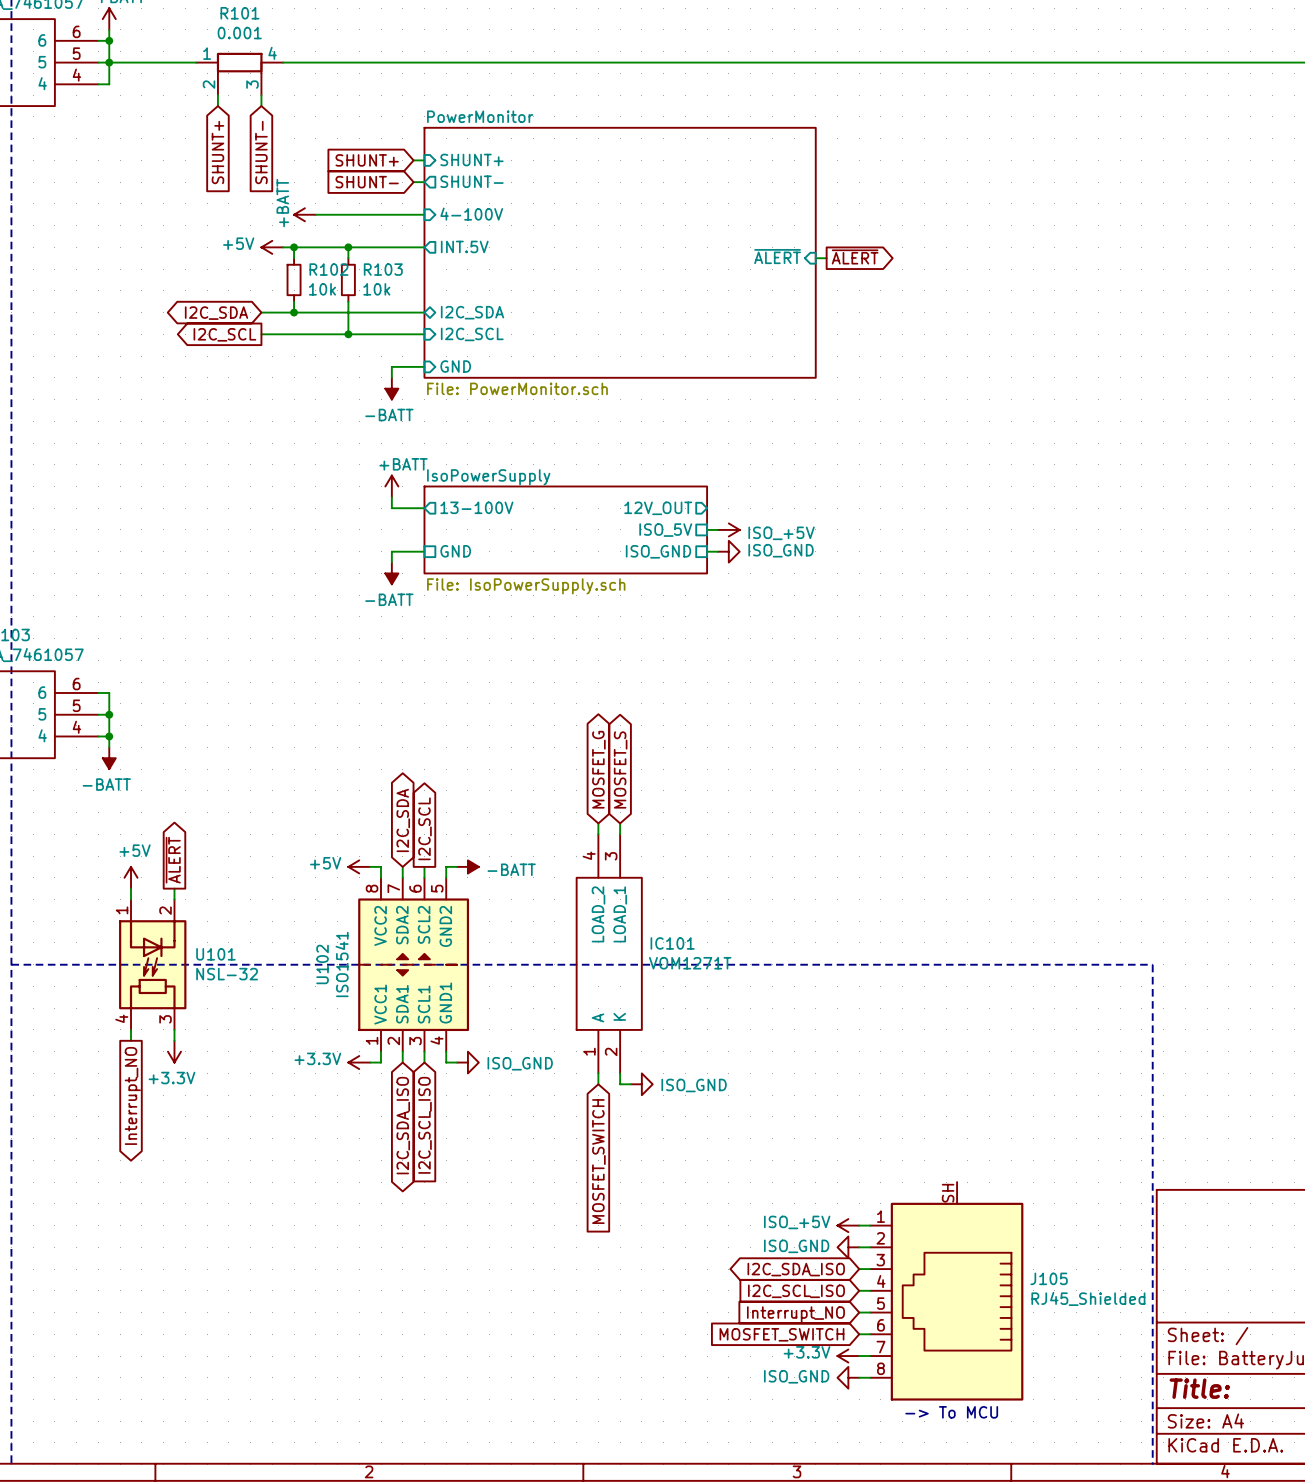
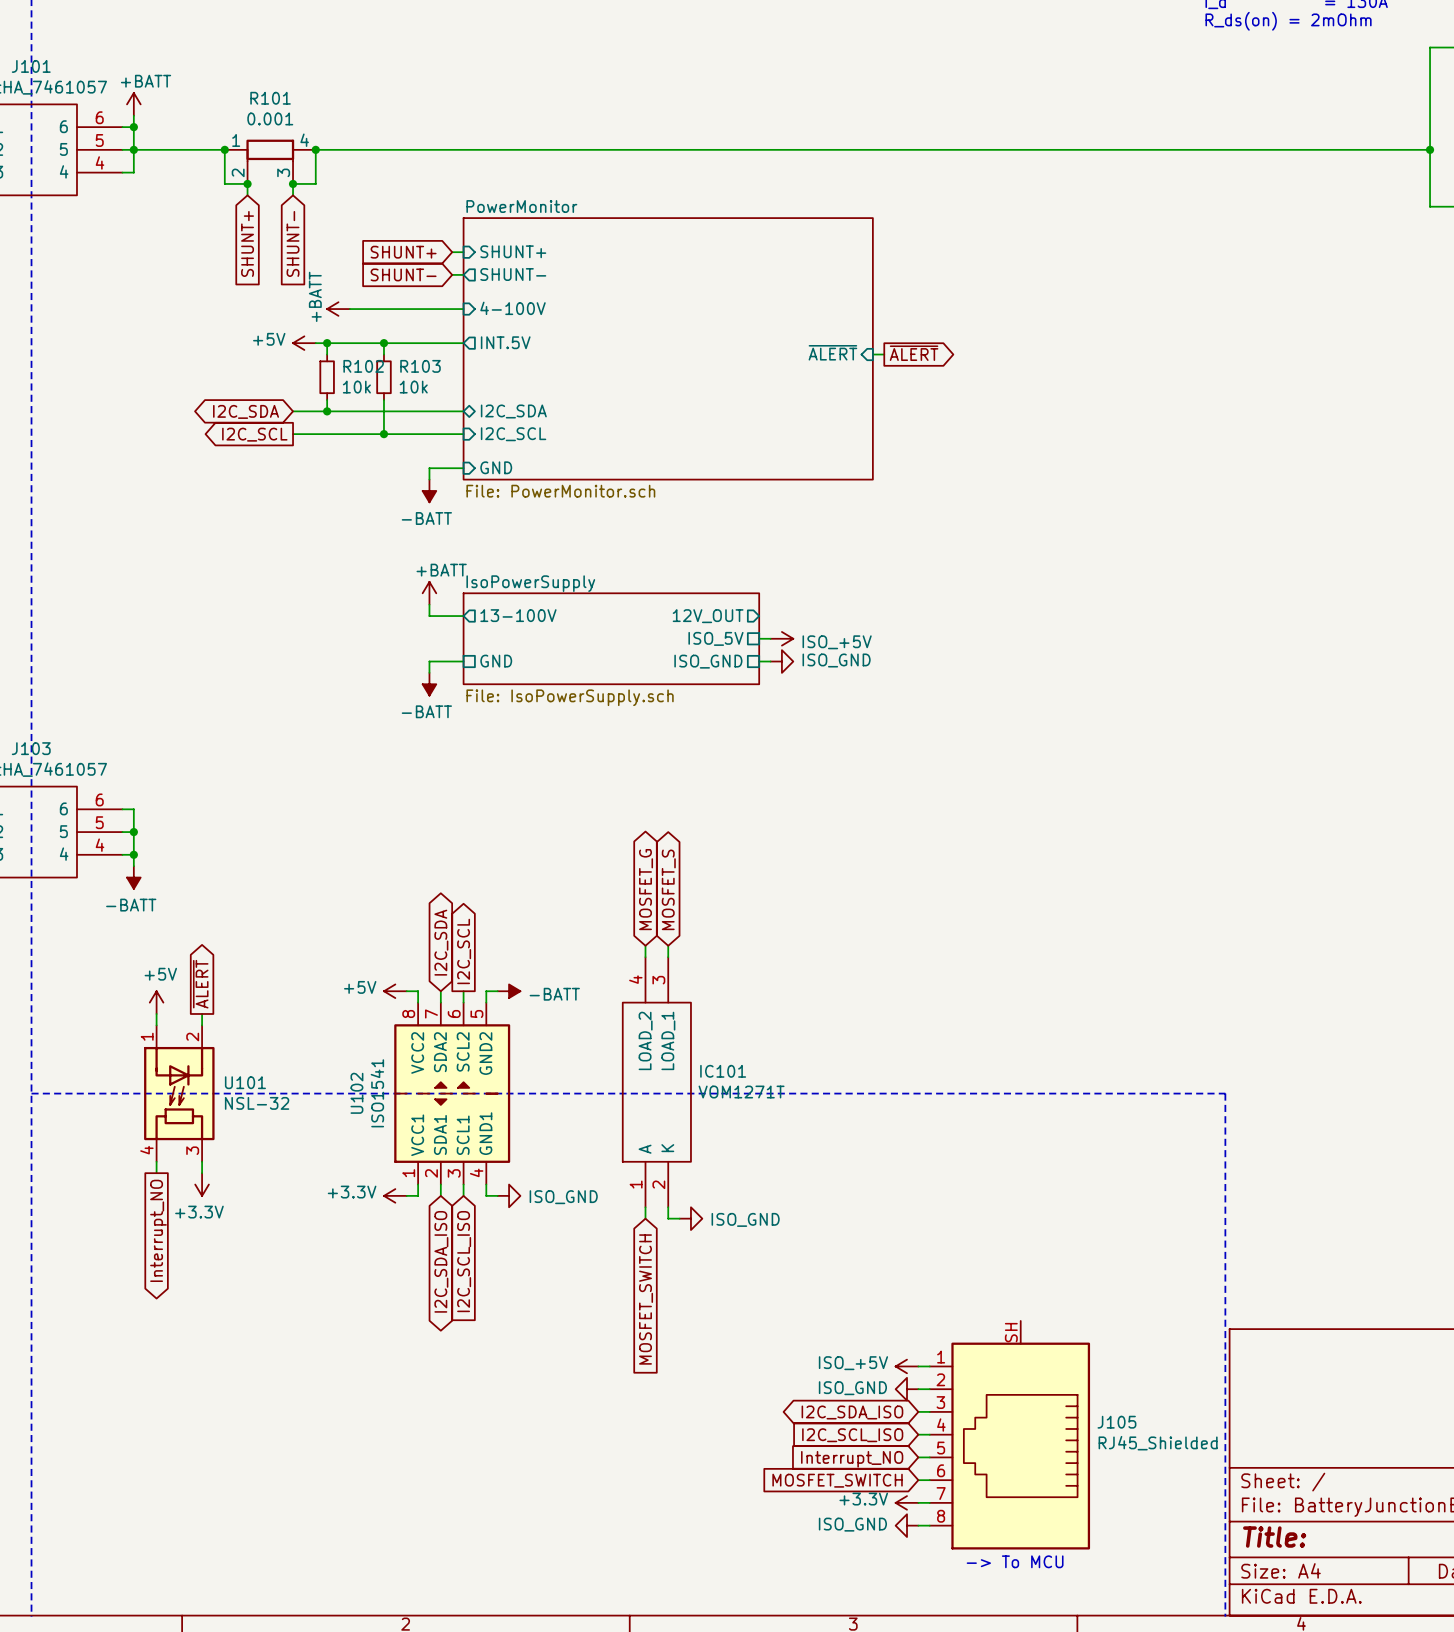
wire: none -> (224, 149) (224, 183) (247, 183)
junction: none -> (224, 149)
wire: none -> (315, 149) (315, 183) (293, 183)
junction: none -> (315, 149)
junction: none -> (247, 183)
junction: none -> (293, 183)

